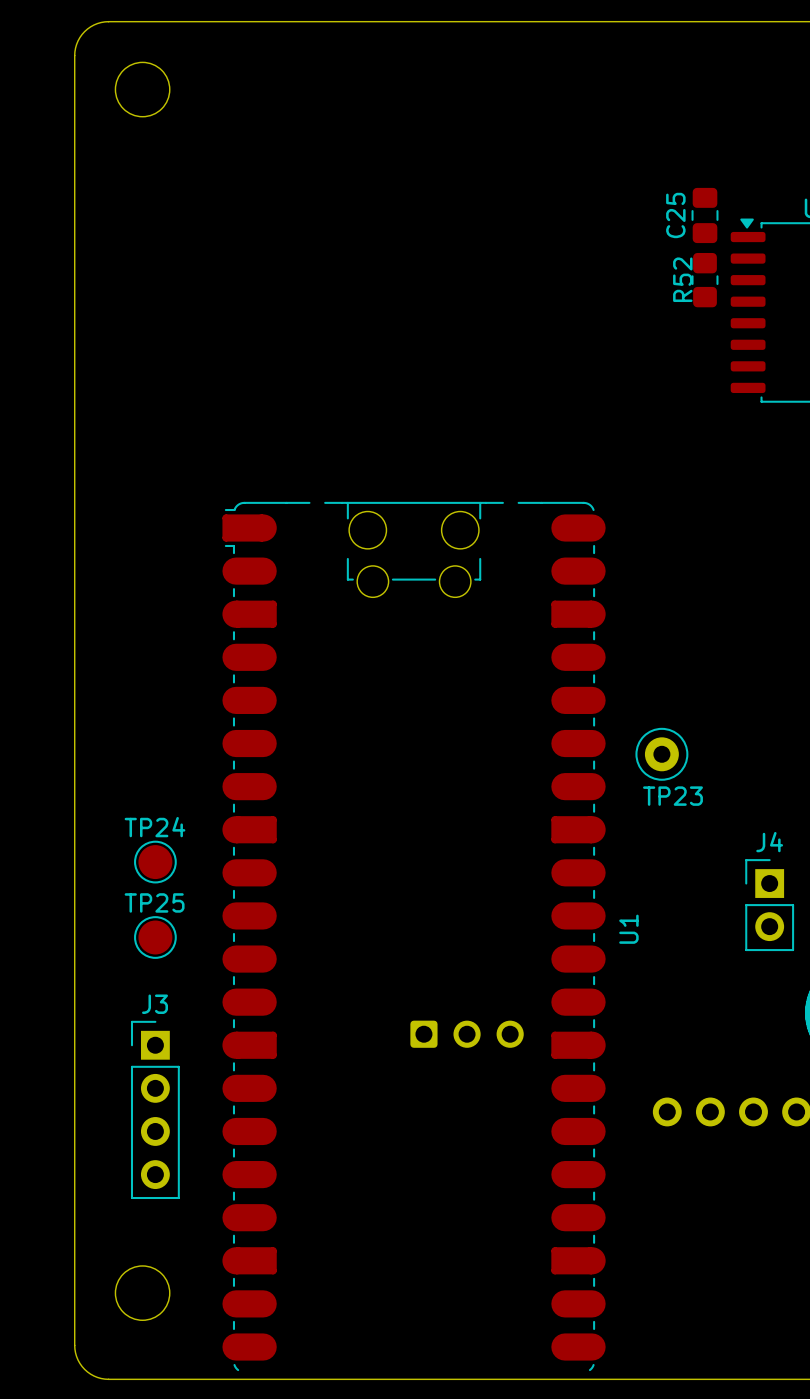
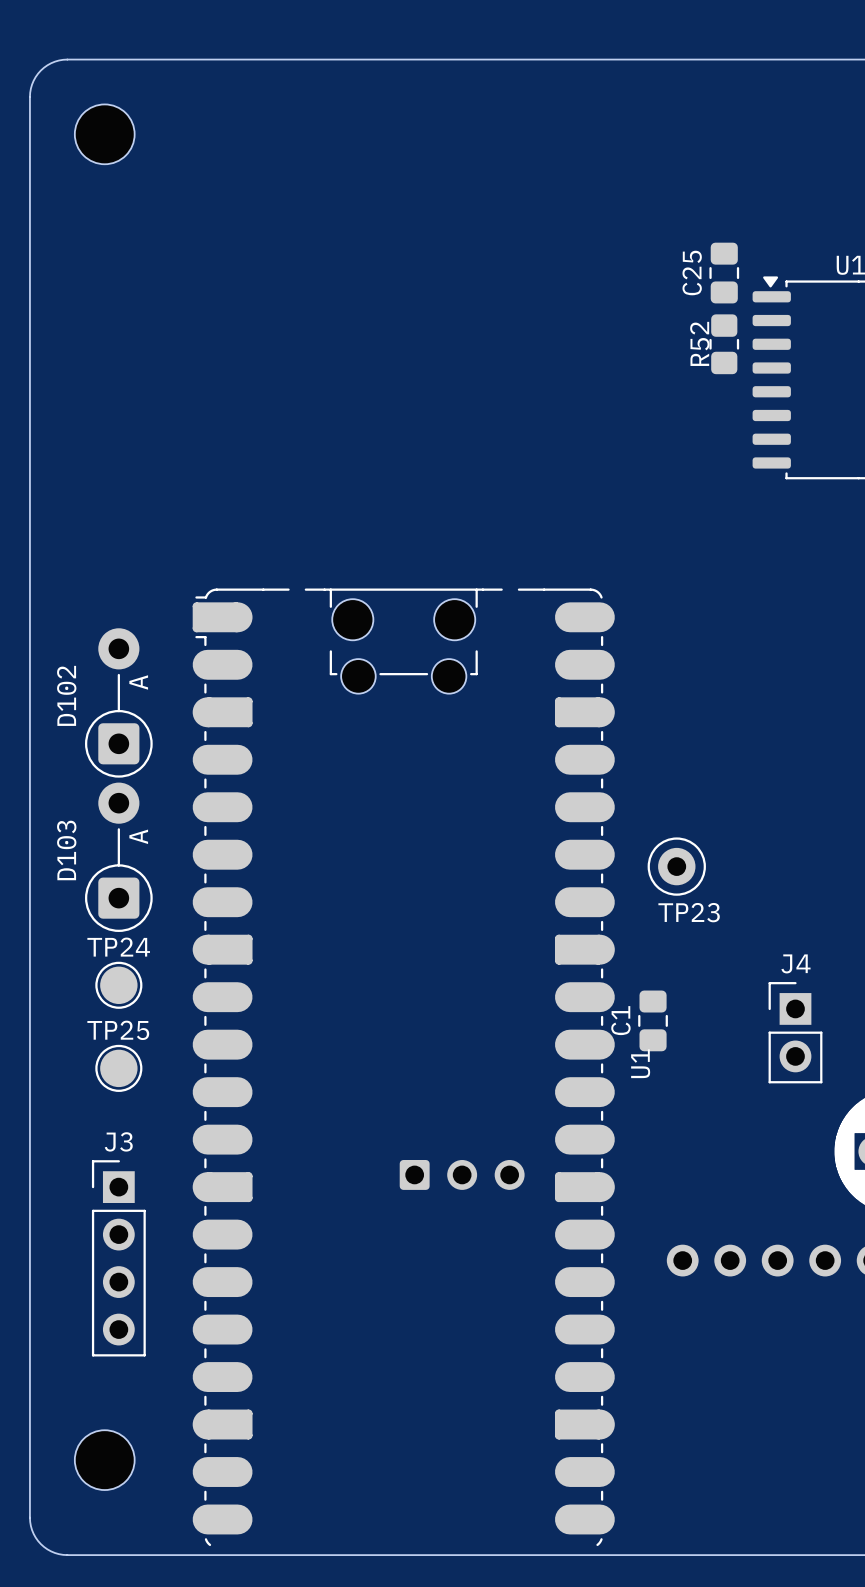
D102: none -> (118, 702)
D103: none -> (118, 857)
C1: none -> (653, 1020)

